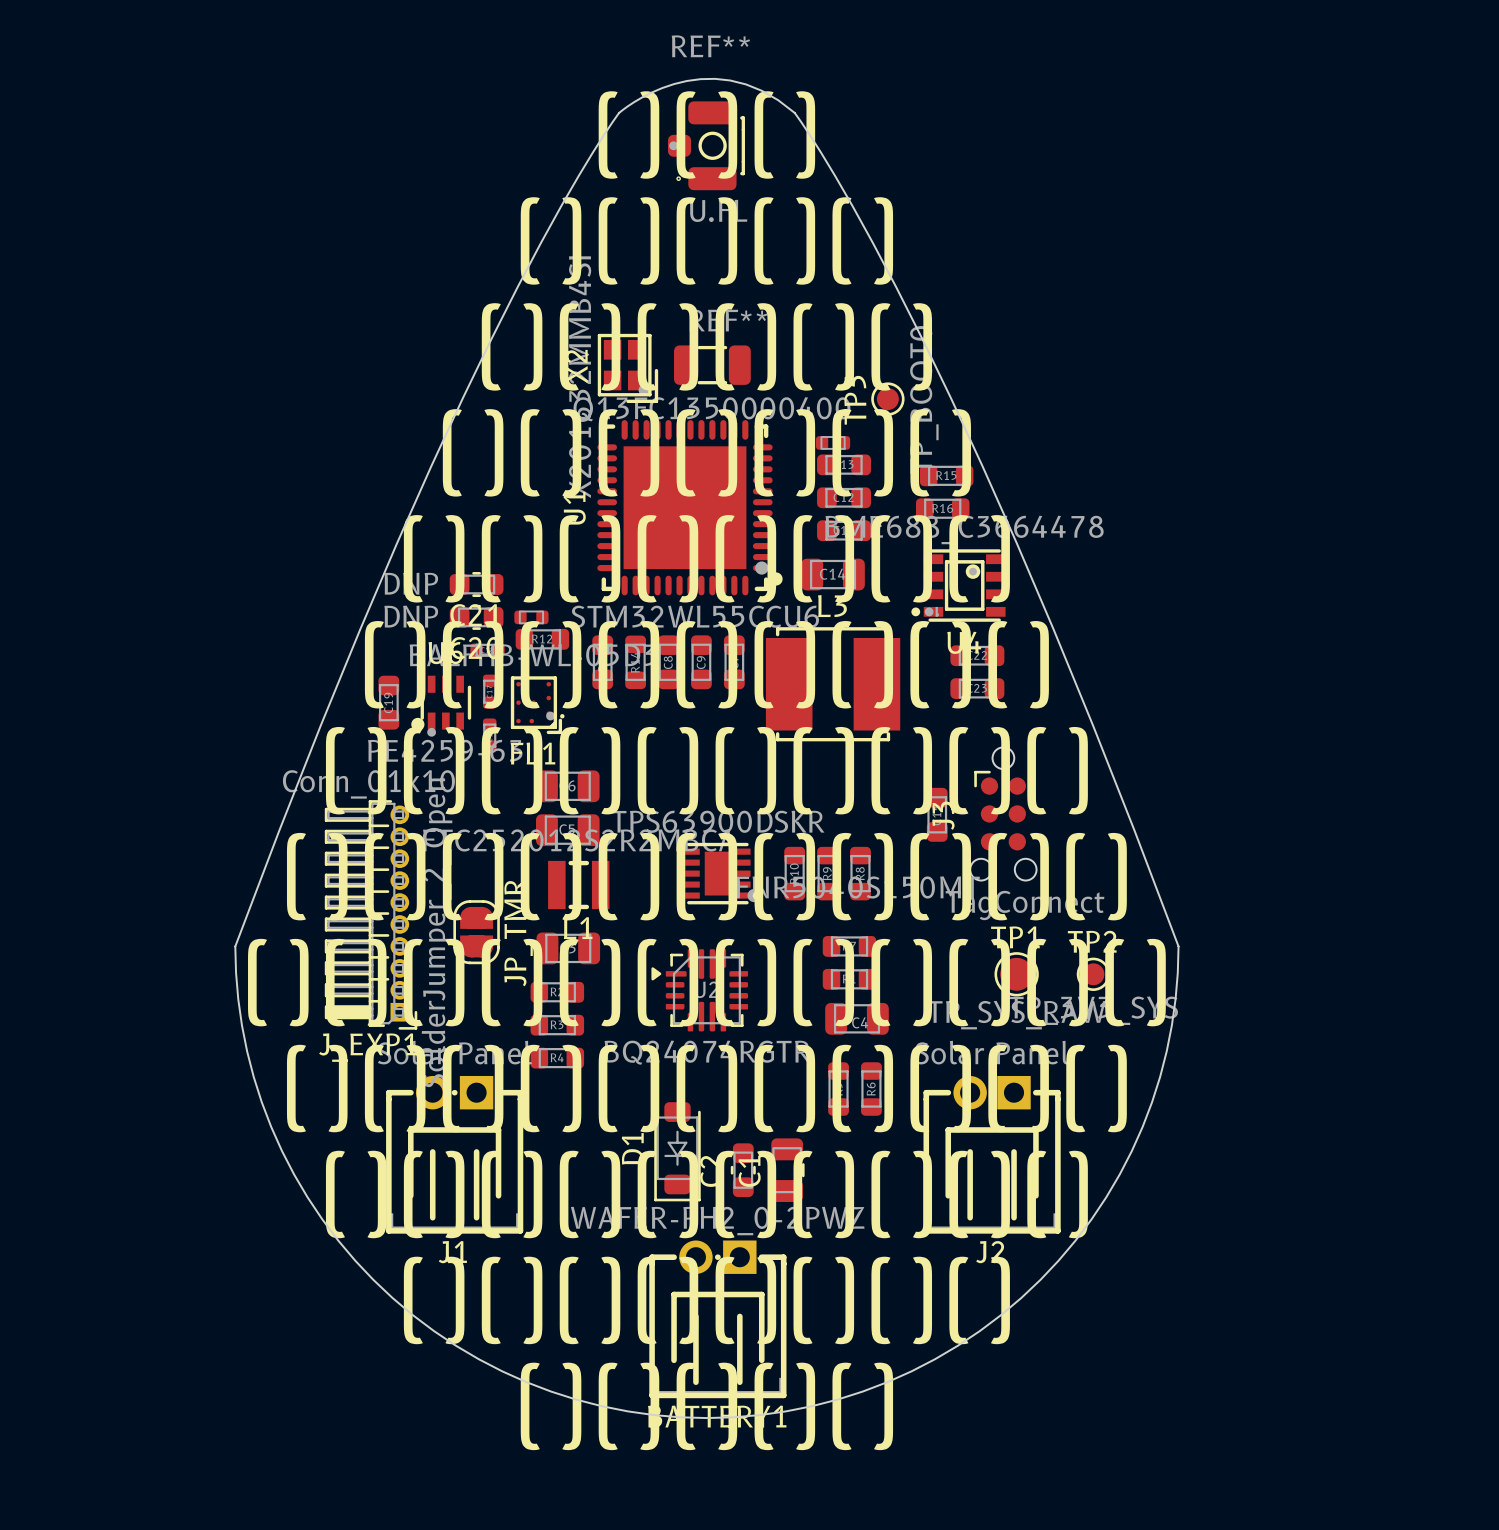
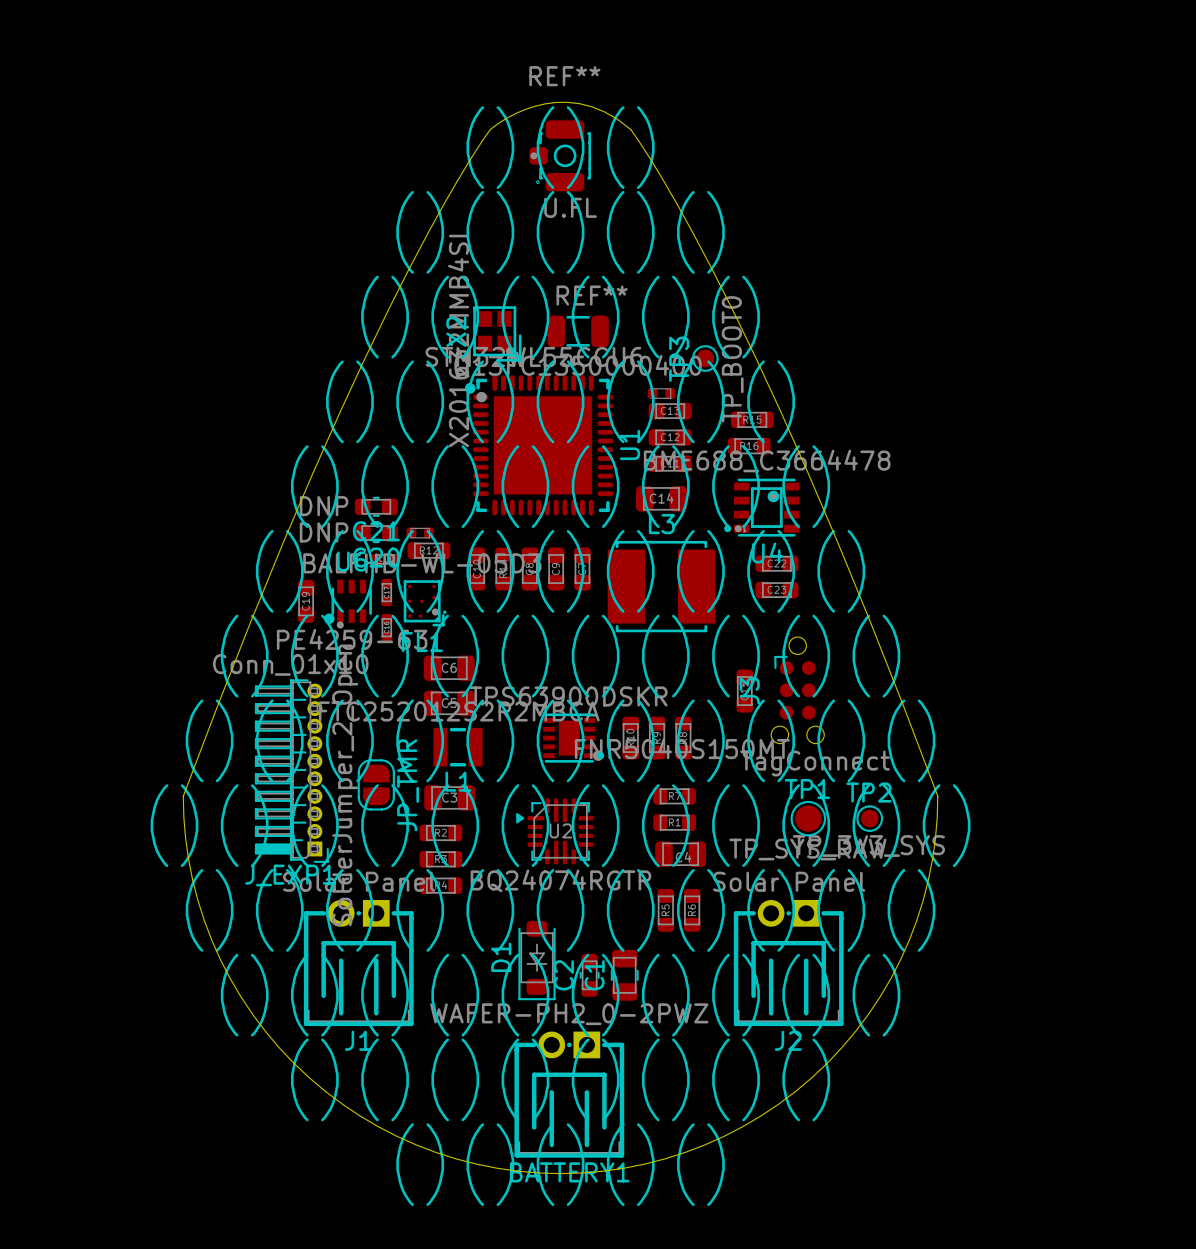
part position: (712, 365) -> (578, 331)
U1 rotation: 0° (689, 507) -> 180° (539, 445)

